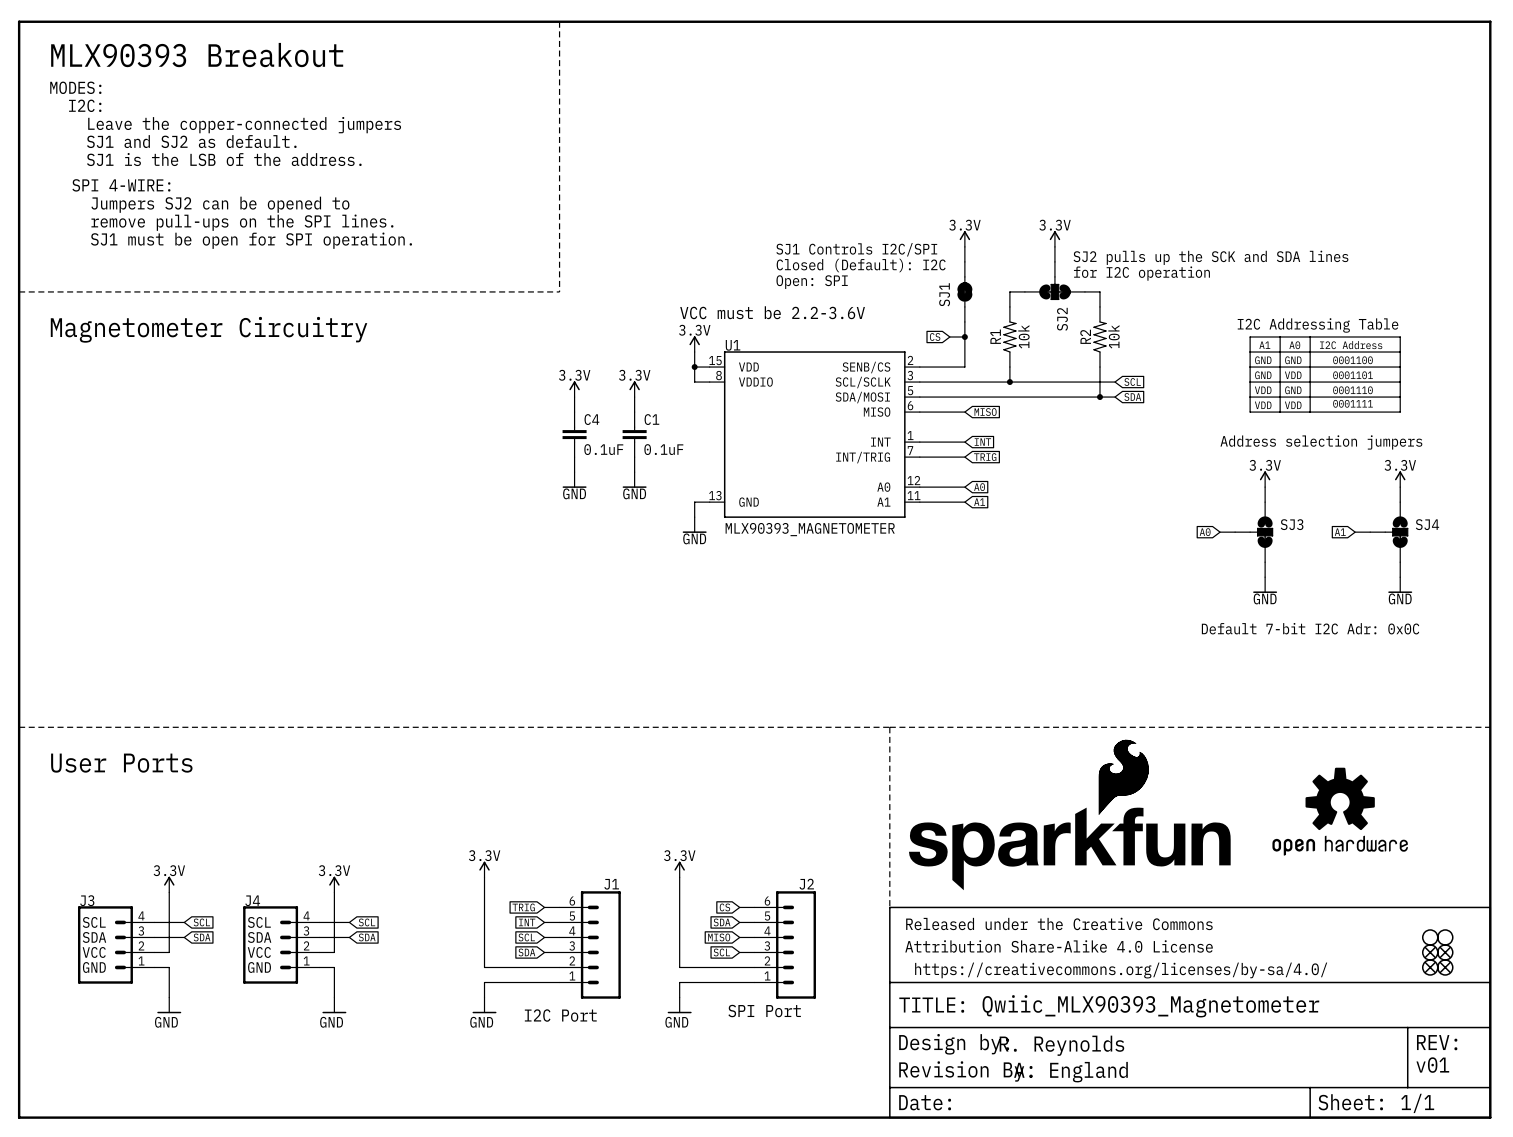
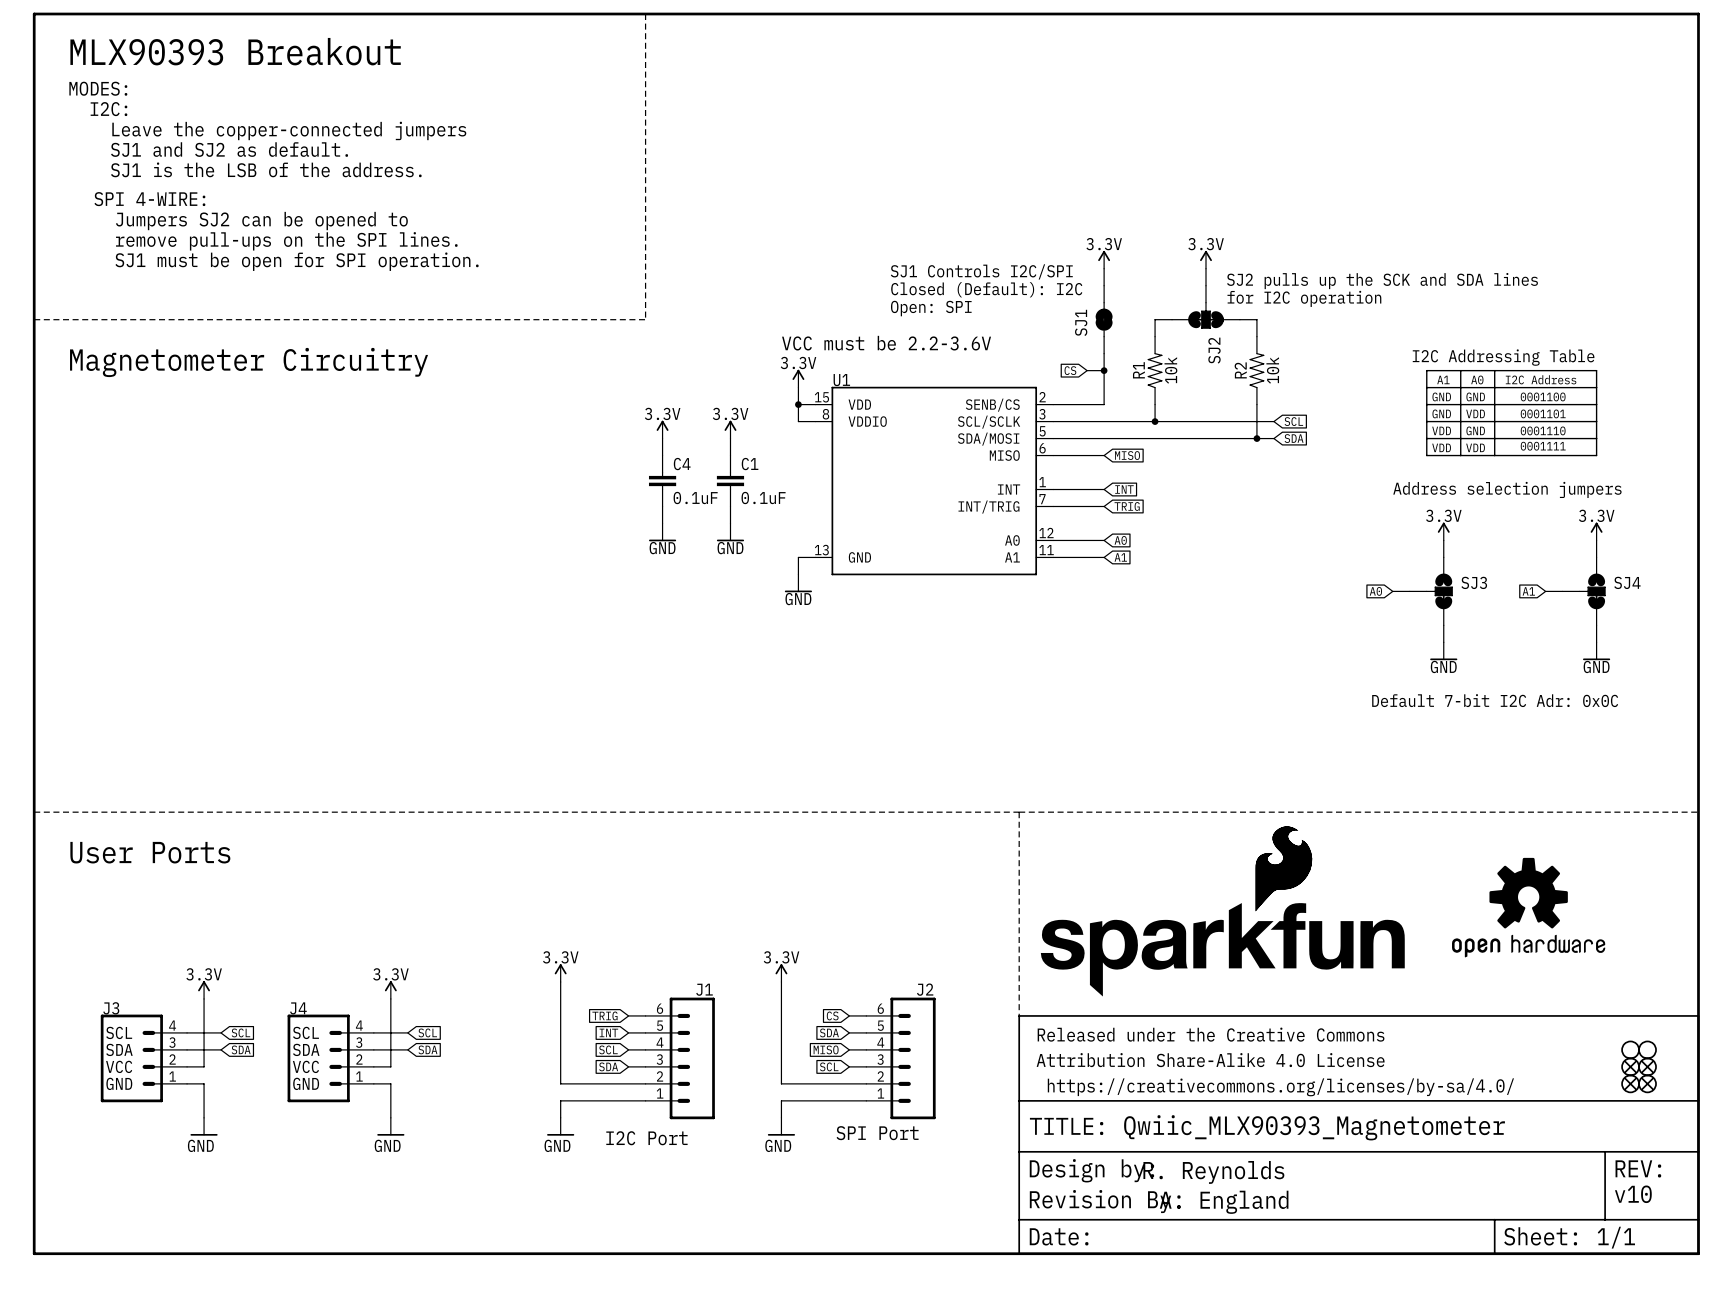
U1 value: MLX90393_MAGNETOMETER (810, 529) -> none
text: v01 (1432, 1065) -> v10 (1633, 1194)

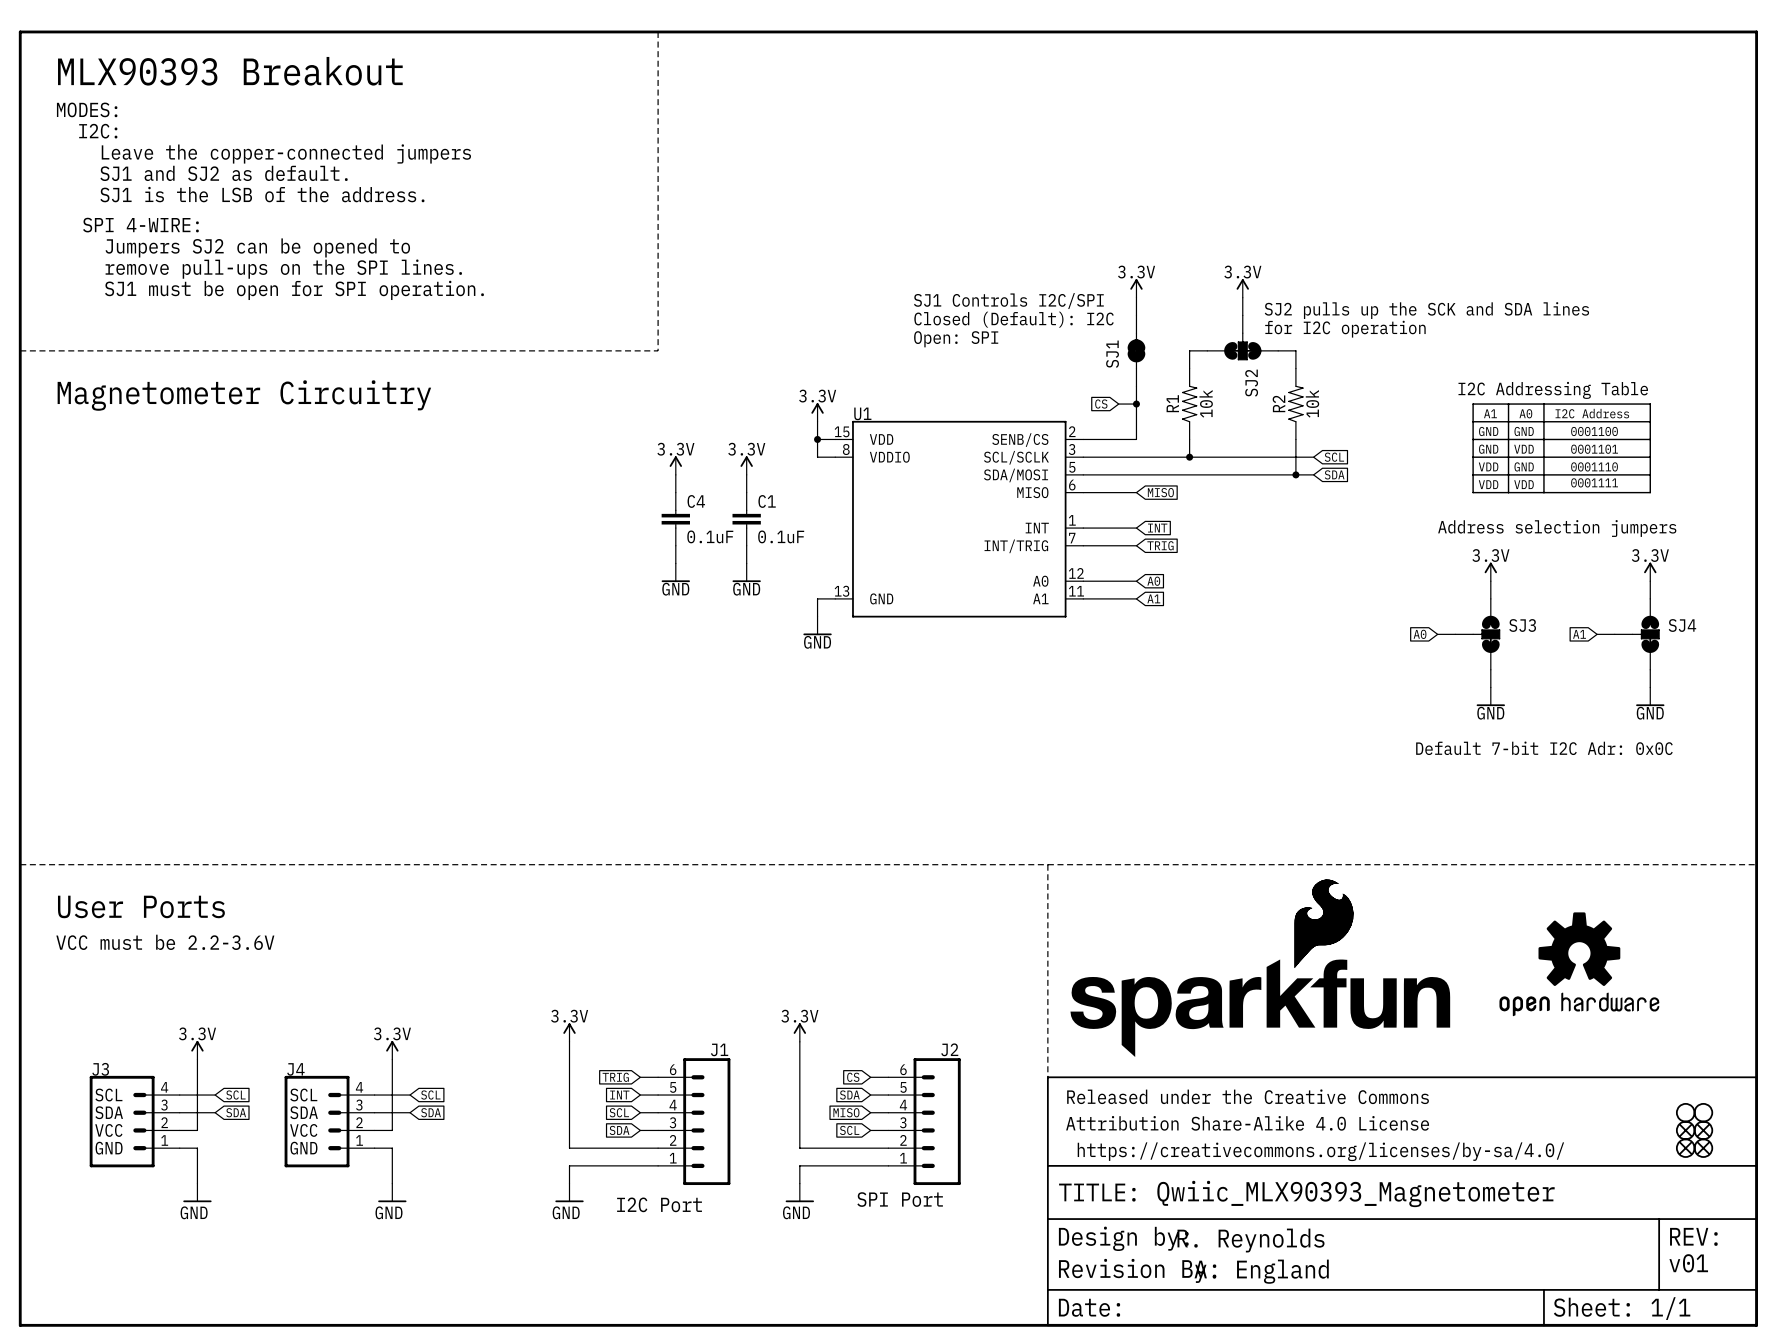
text: VCC must be 2.2-3.6V (886, 343) -> none
text: none -> VCC must be 2.2-3.6V (165, 942)
text: v10 (1633, 1194) -> v01 (1688, 1263)

